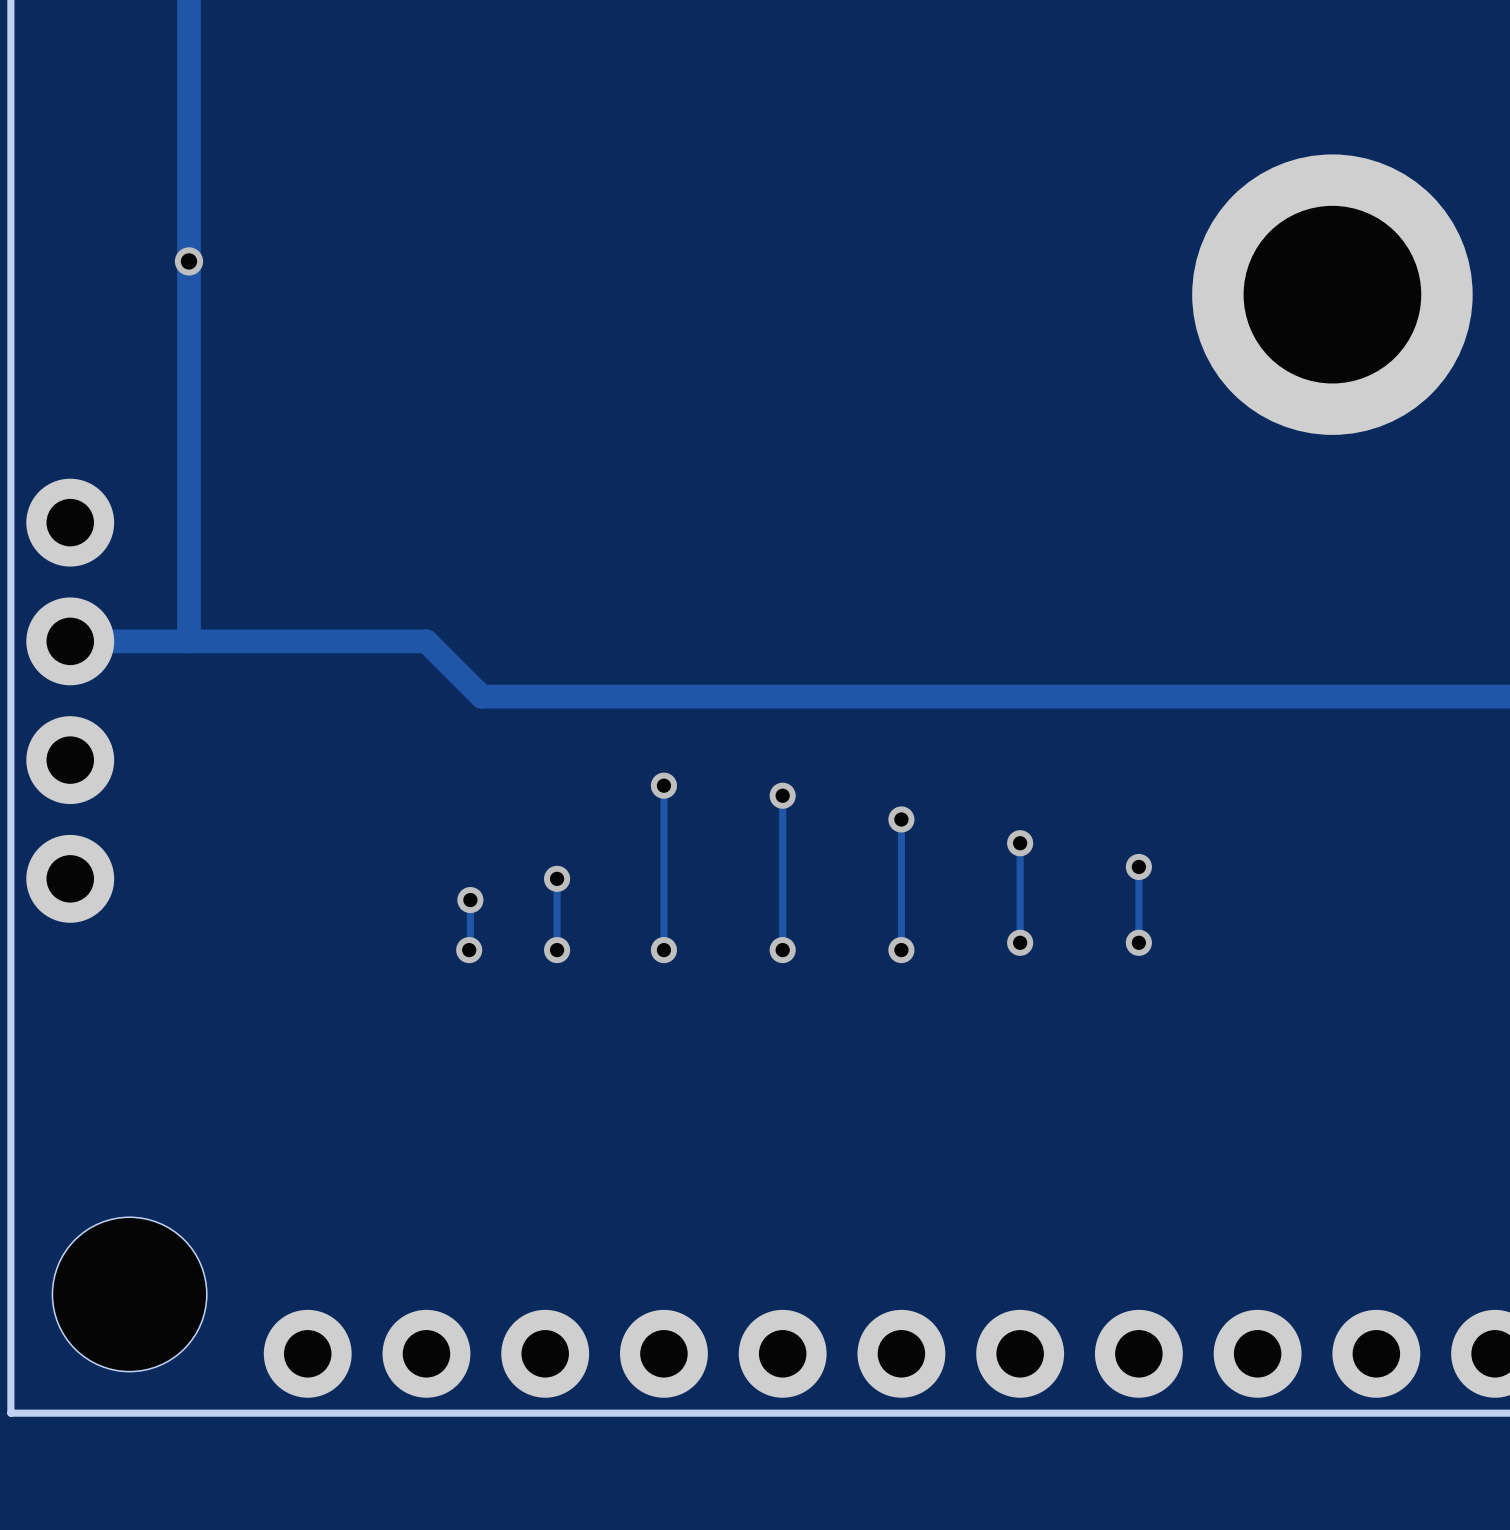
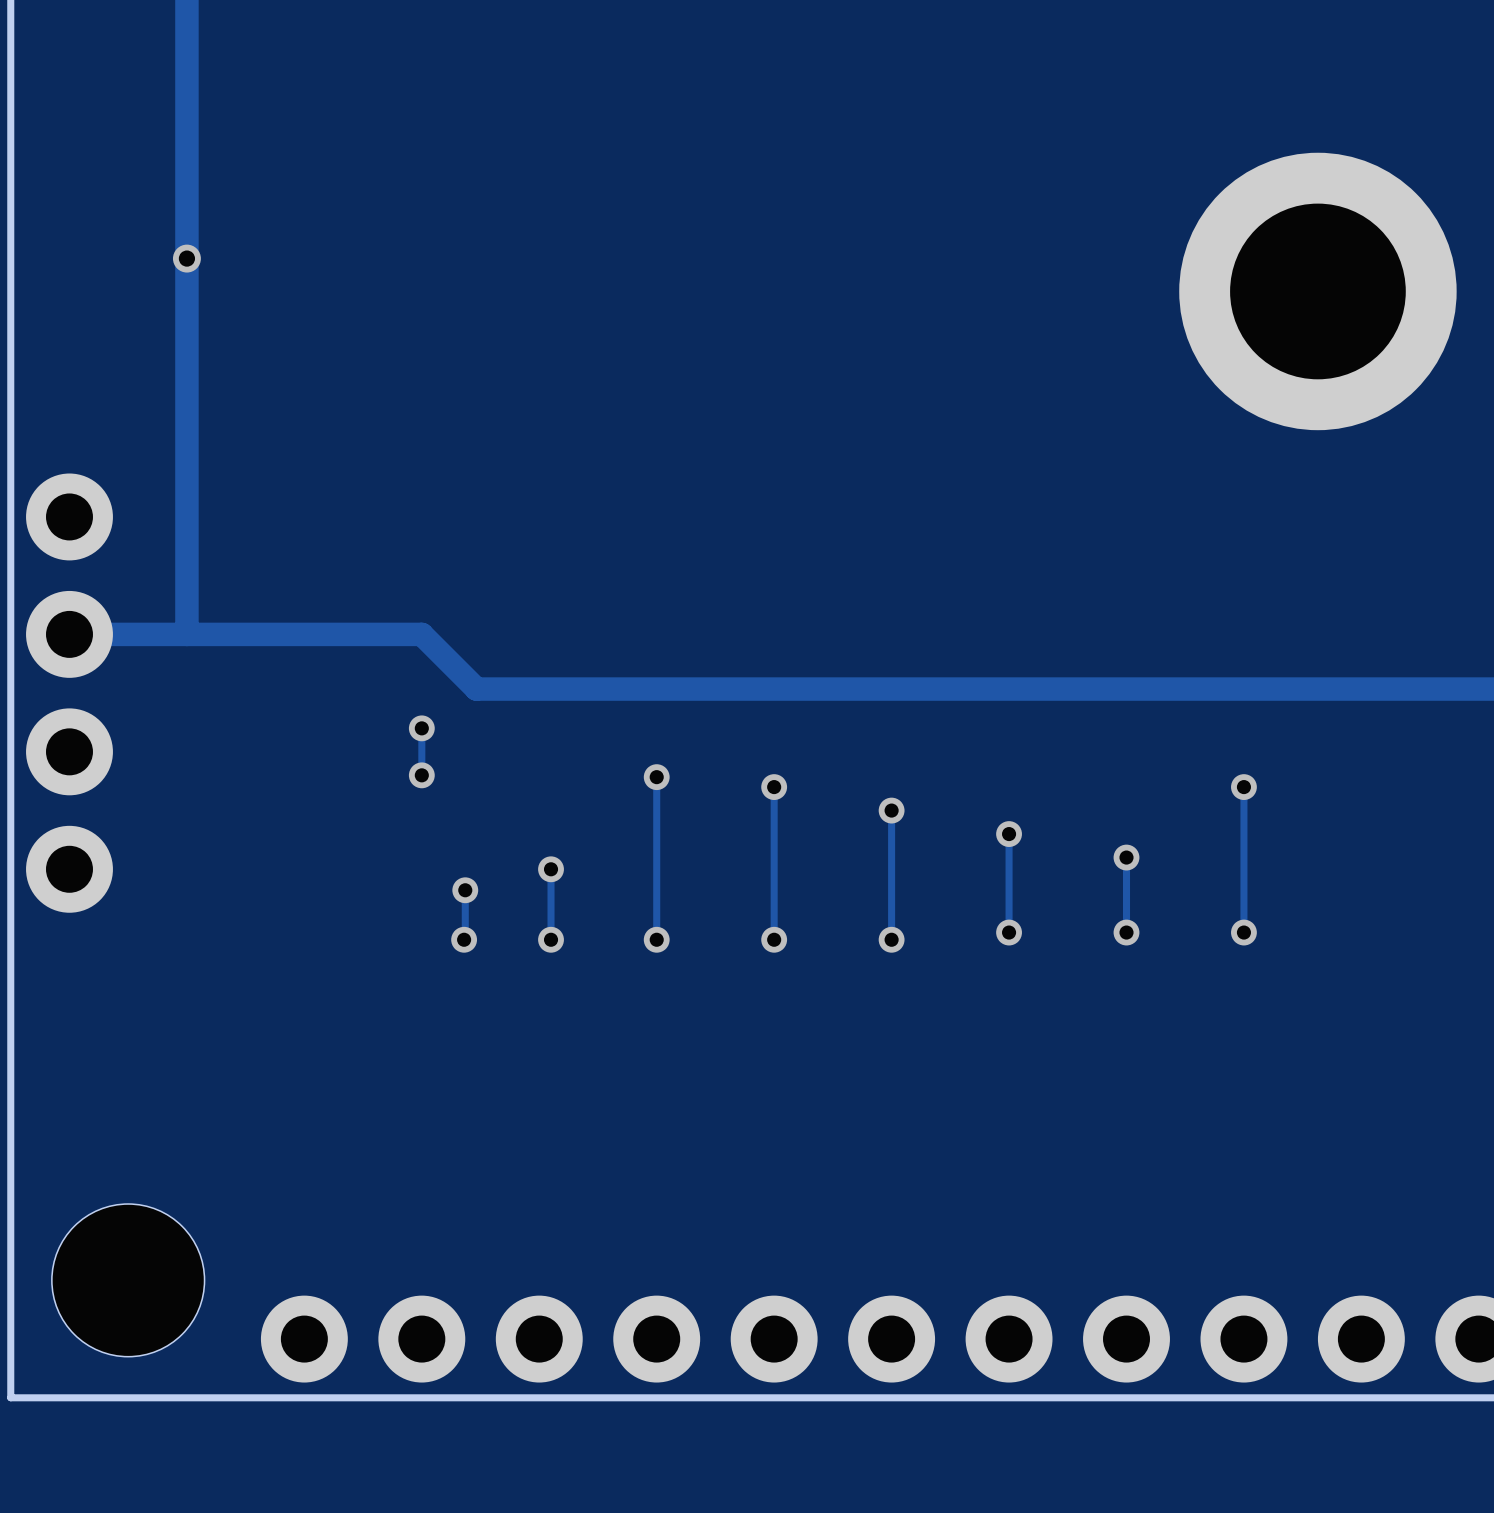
track: none -> (421, 728) (421, 775)
via: none -> (421, 728)
via: none -> (421, 775)
track: none -> (1243, 787) (1243, 932)
via: none -> (1243, 787)
via: none -> (1243, 932)

